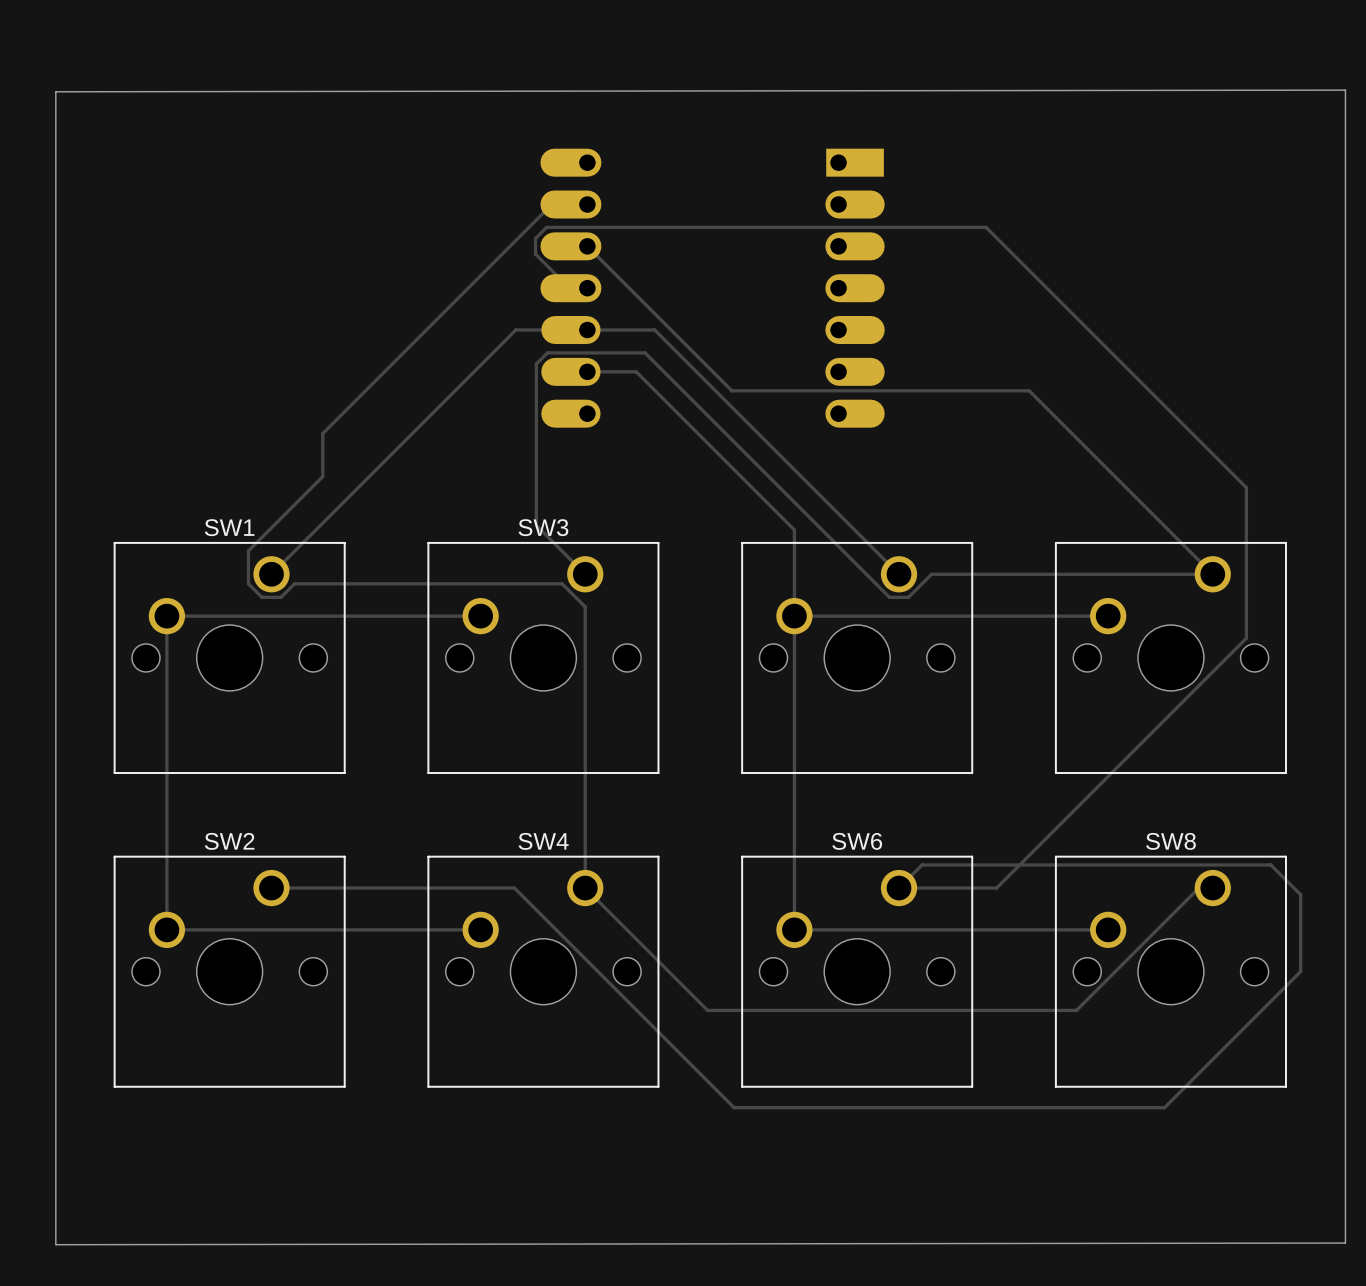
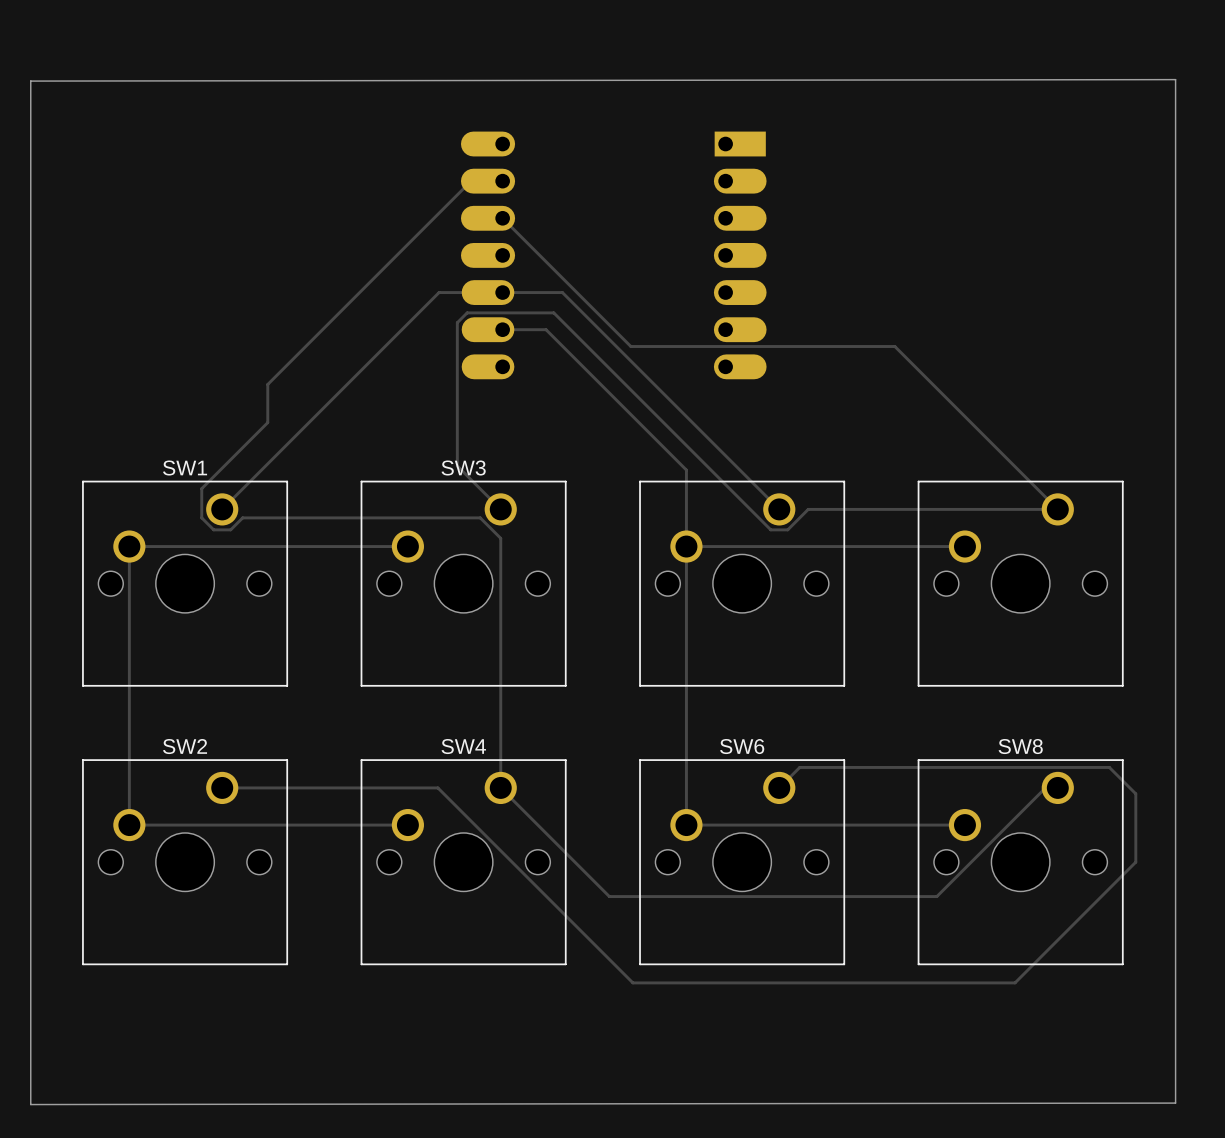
track: (587, 288) (569, 288) (535, 254) (535, 238) (546, 227) (986, 227) (1246, 487) (1246, 638) (996, 888) (899, 888) -> none

